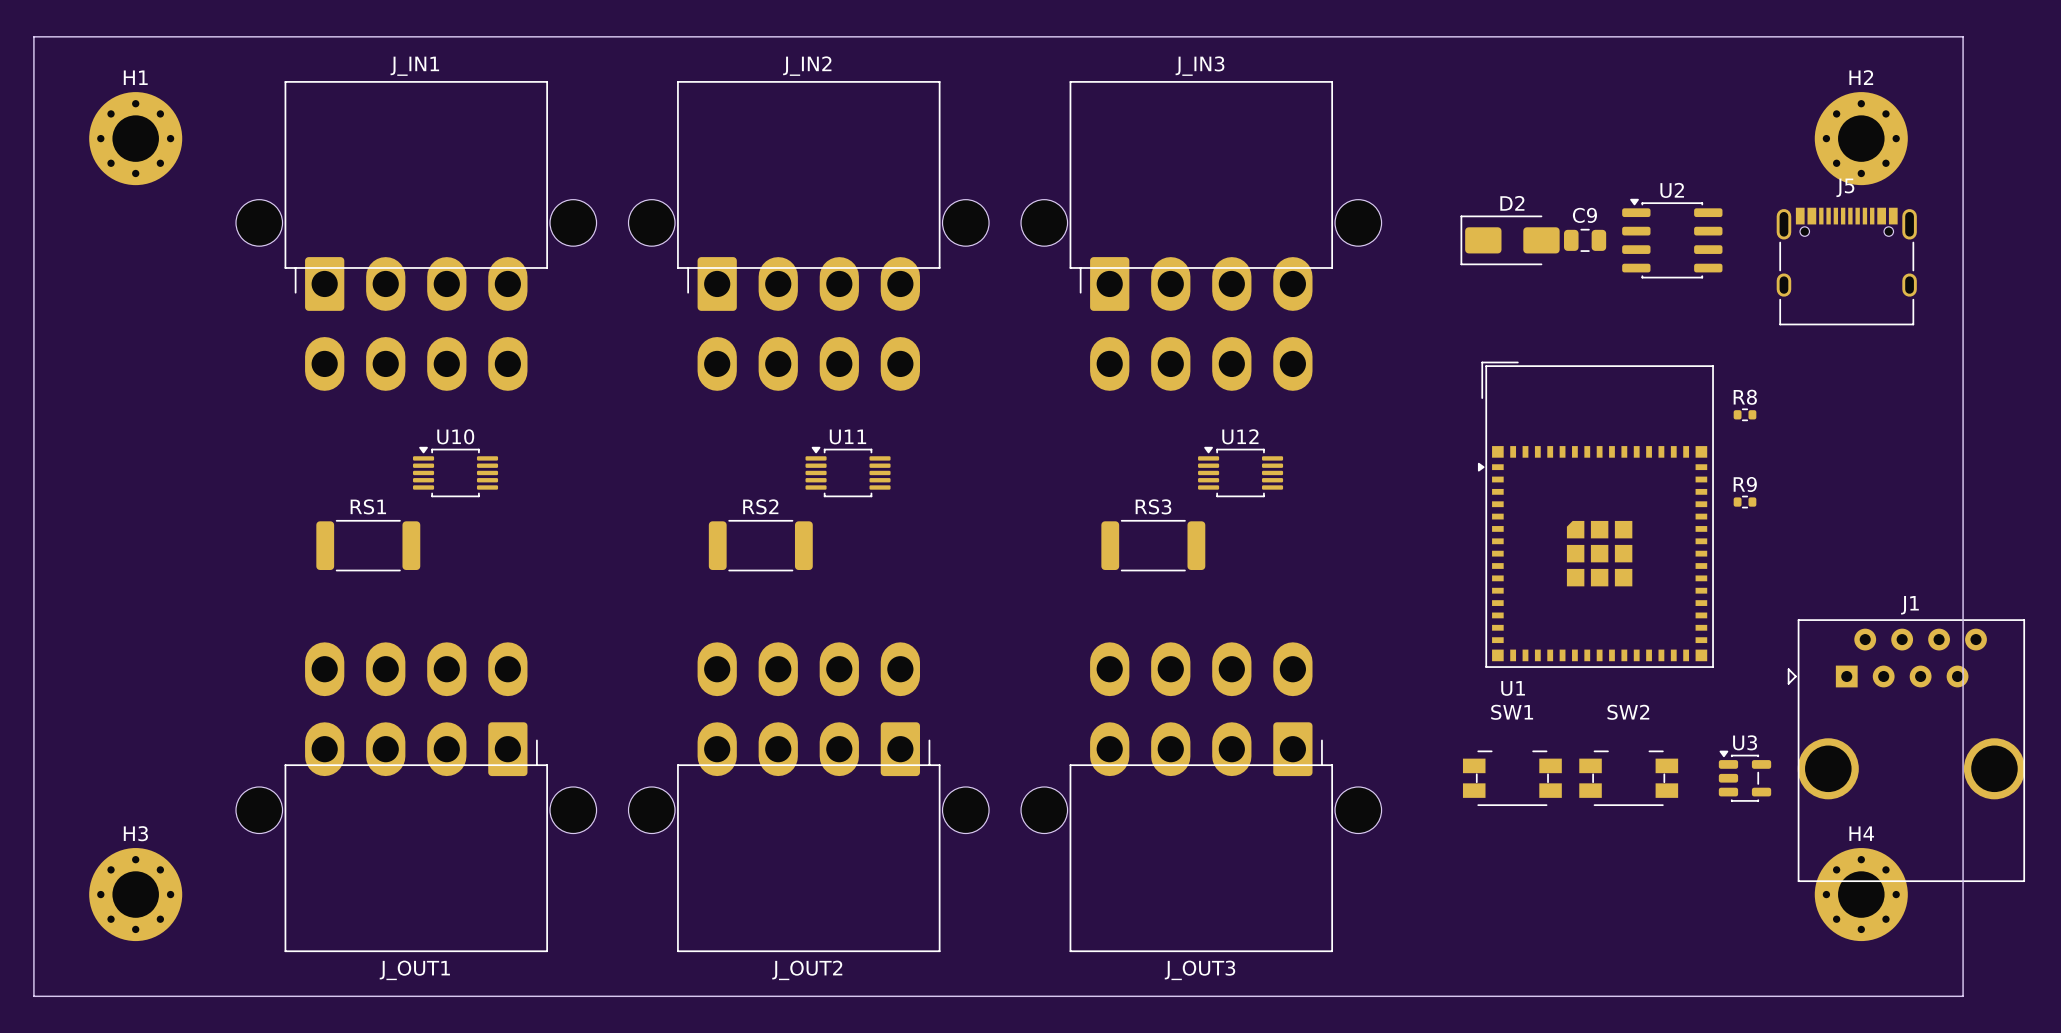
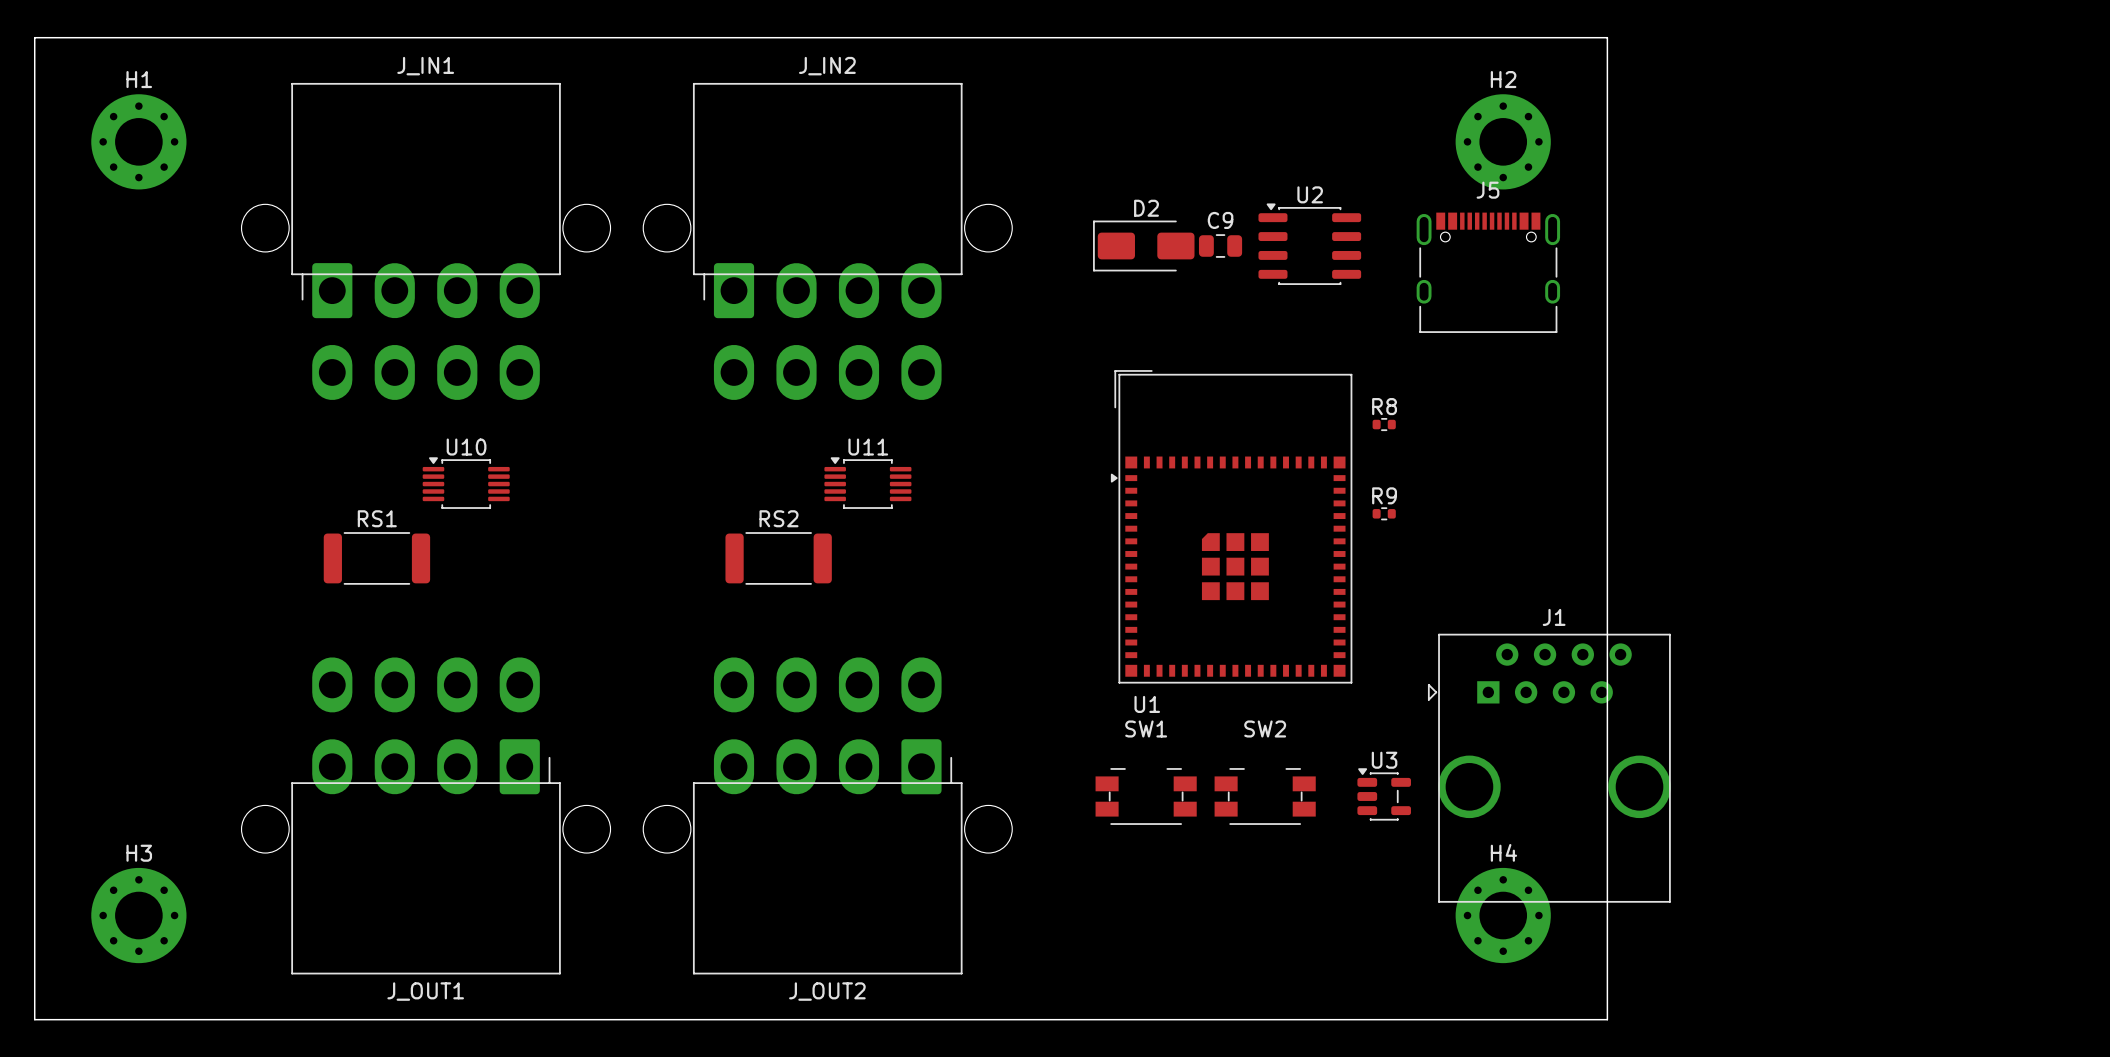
board edge: (1570, 36) (1963, 36) (1963, 996) (1570, 996) -> (1607, 37) (1607, 1019)
H2 position: (1861, 138) -> (1503, 141)
J_IN3: (1201, 235) -> none
U2 position: (1672, 238) -> (1309, 244)
D2 position: (1510, 240) -> (1143, 246)
C9 position: (1585, 240) -> (1220, 246)
J5 position: (1846, 266) -> (1488, 272)
R8 position: (1745, 414) -> (1384, 424)
U12: (1240, 472) -> none
R9 position: (1745, 502) -> (1384, 513)
U1 position: (1595, 514) -> (1231, 526)
RS3: (1153, 545) -> none
J1 position: (1906, 750) -> (1549, 768)
U3 position: (1745, 776) -> (1384, 794)
SW1 position: (1512, 778) -> (1146, 796)
SW2 position: (1628, 778) -> (1265, 796)
J_OUT3: (1201, 797) -> none
H4 position: (1861, 894) -> (1503, 915)

